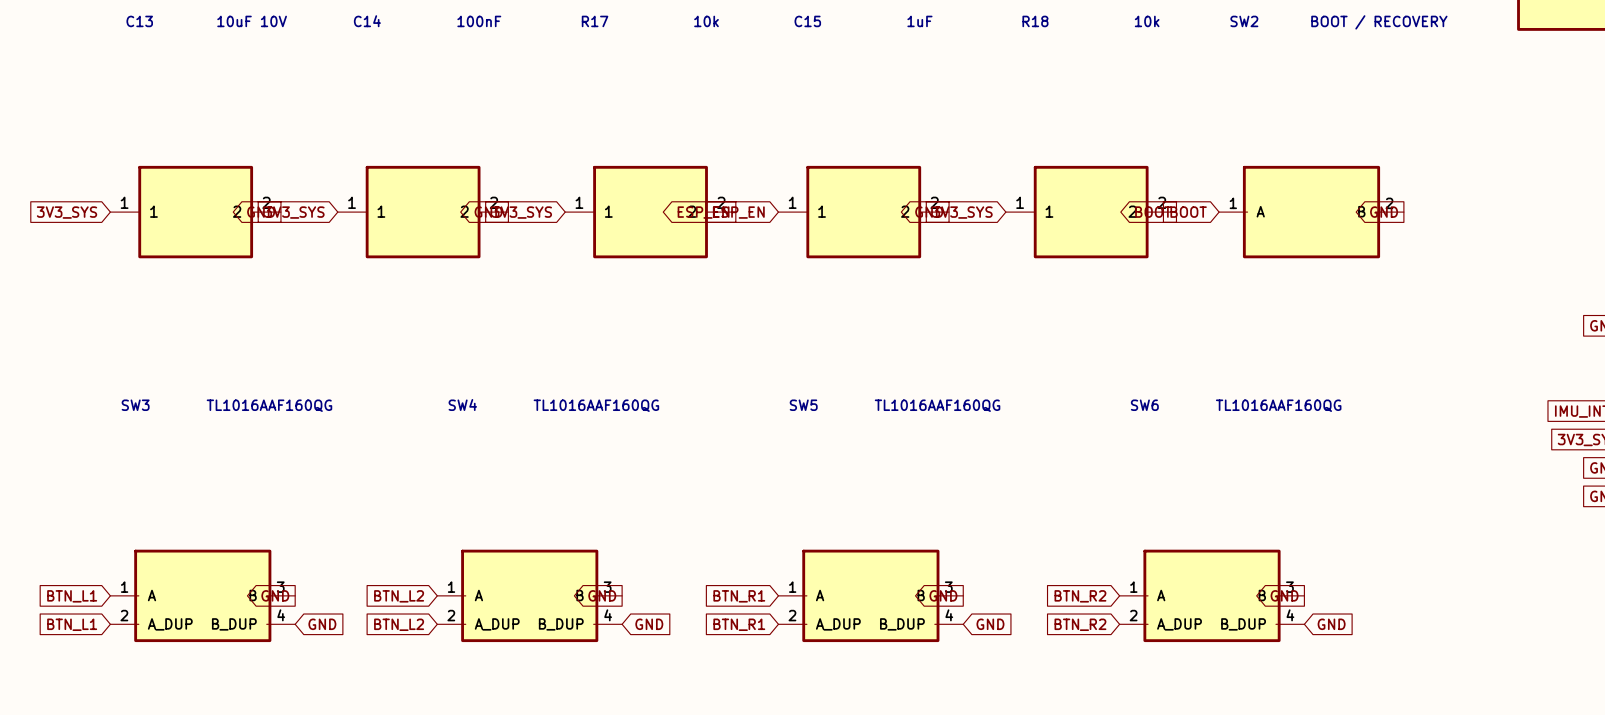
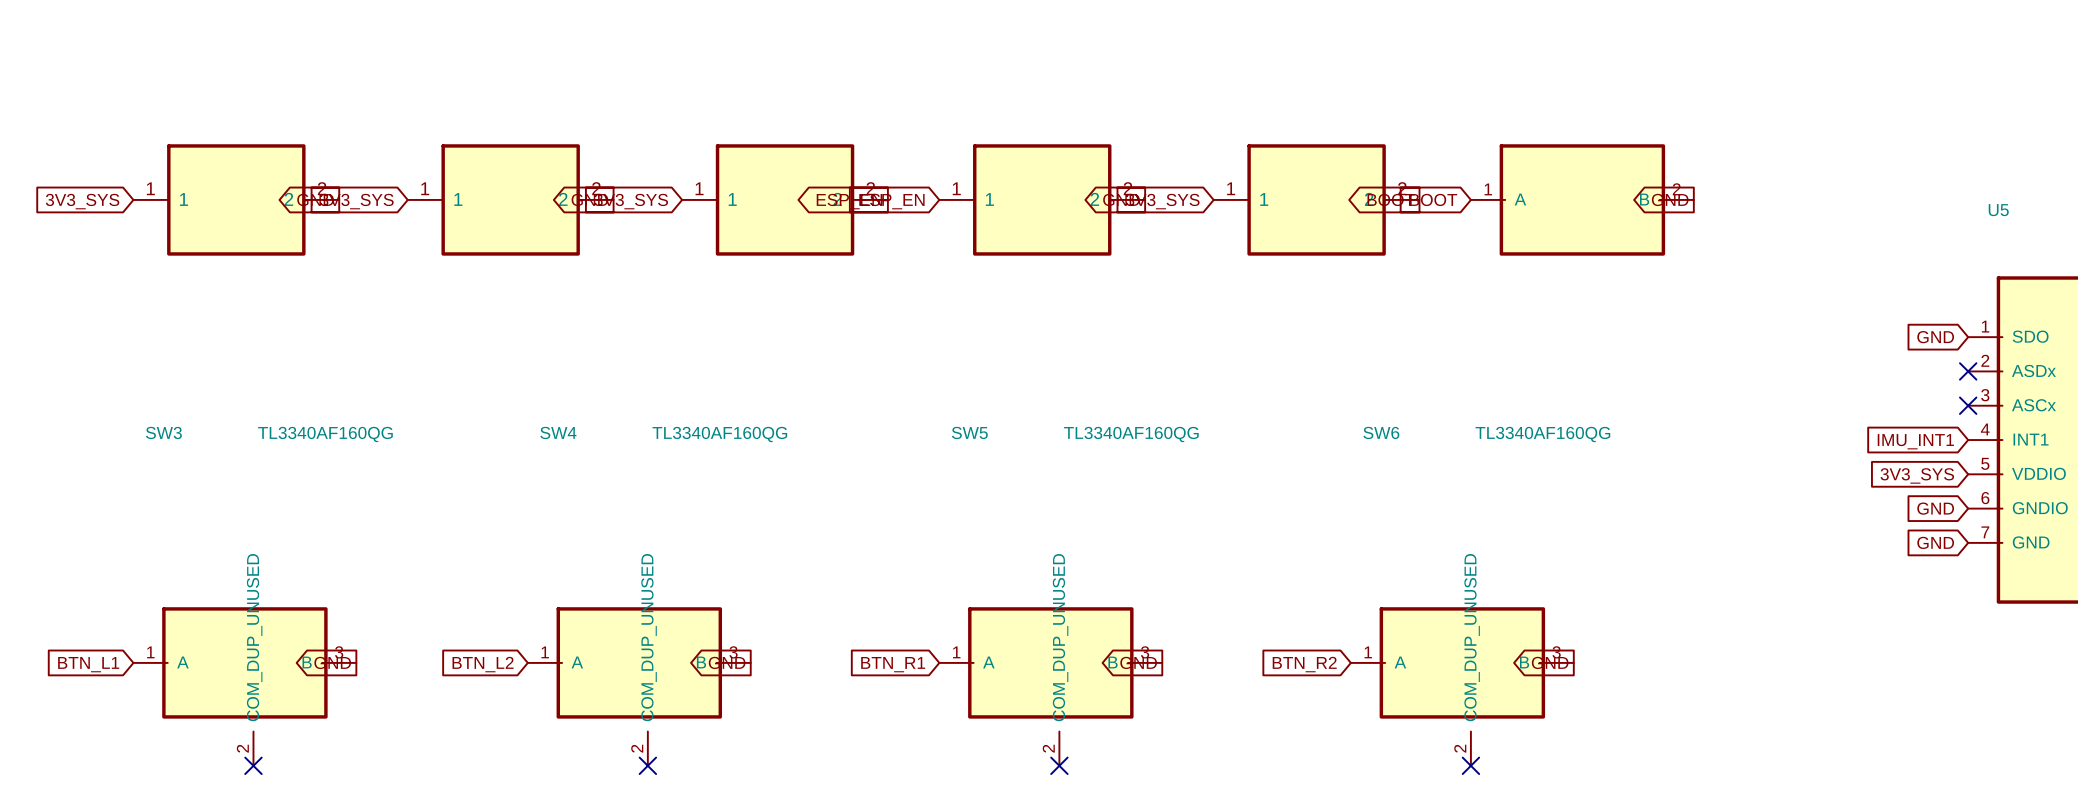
SW3 value: TL1016AAF160QG (269, 405) -> TL3340AF160QG (325, 434)
SW4 value: TL1016AAF160QG (596, 405) -> TL3340AF160QG (719, 434)
SW5 value: TL1016AAF160QG (937, 405) -> TL3340AF160QG (1131, 434)
SW6 value: TL1016AAF160QG (1278, 405) -> TL3340AF160QG (1542, 434)
SW3 symbol: [110, 549, 296, 643] -> [133, 607, 357, 766]
SW4 symbol: [437, 549, 623, 643] -> [527, 607, 751, 766]
SW5 symbol: [778, 549, 964, 643] -> [939, 607, 1163, 766]
SW6 symbol: [1119, 549, 1305, 643] -> [1350, 607, 1574, 766]
global label: BTN_L1 (72, 624) -> none
global label: GND (322, 624) -> none
global label: BTN_L2 (399, 624) -> none
global label: GND (649, 624) -> none
global label: BTN_R1 (739, 624) -> none
global label: GND (990, 624) -> none
global label: BTN_R2 (1080, 624) -> none
global label: GND (1331, 624) -> none
no-connect mark: none -> (253, 765)
no-connect mark: none -> (647, 765)
no-connect mark: none -> (1059, 765)
no-connect mark: none -> (1470, 765)

